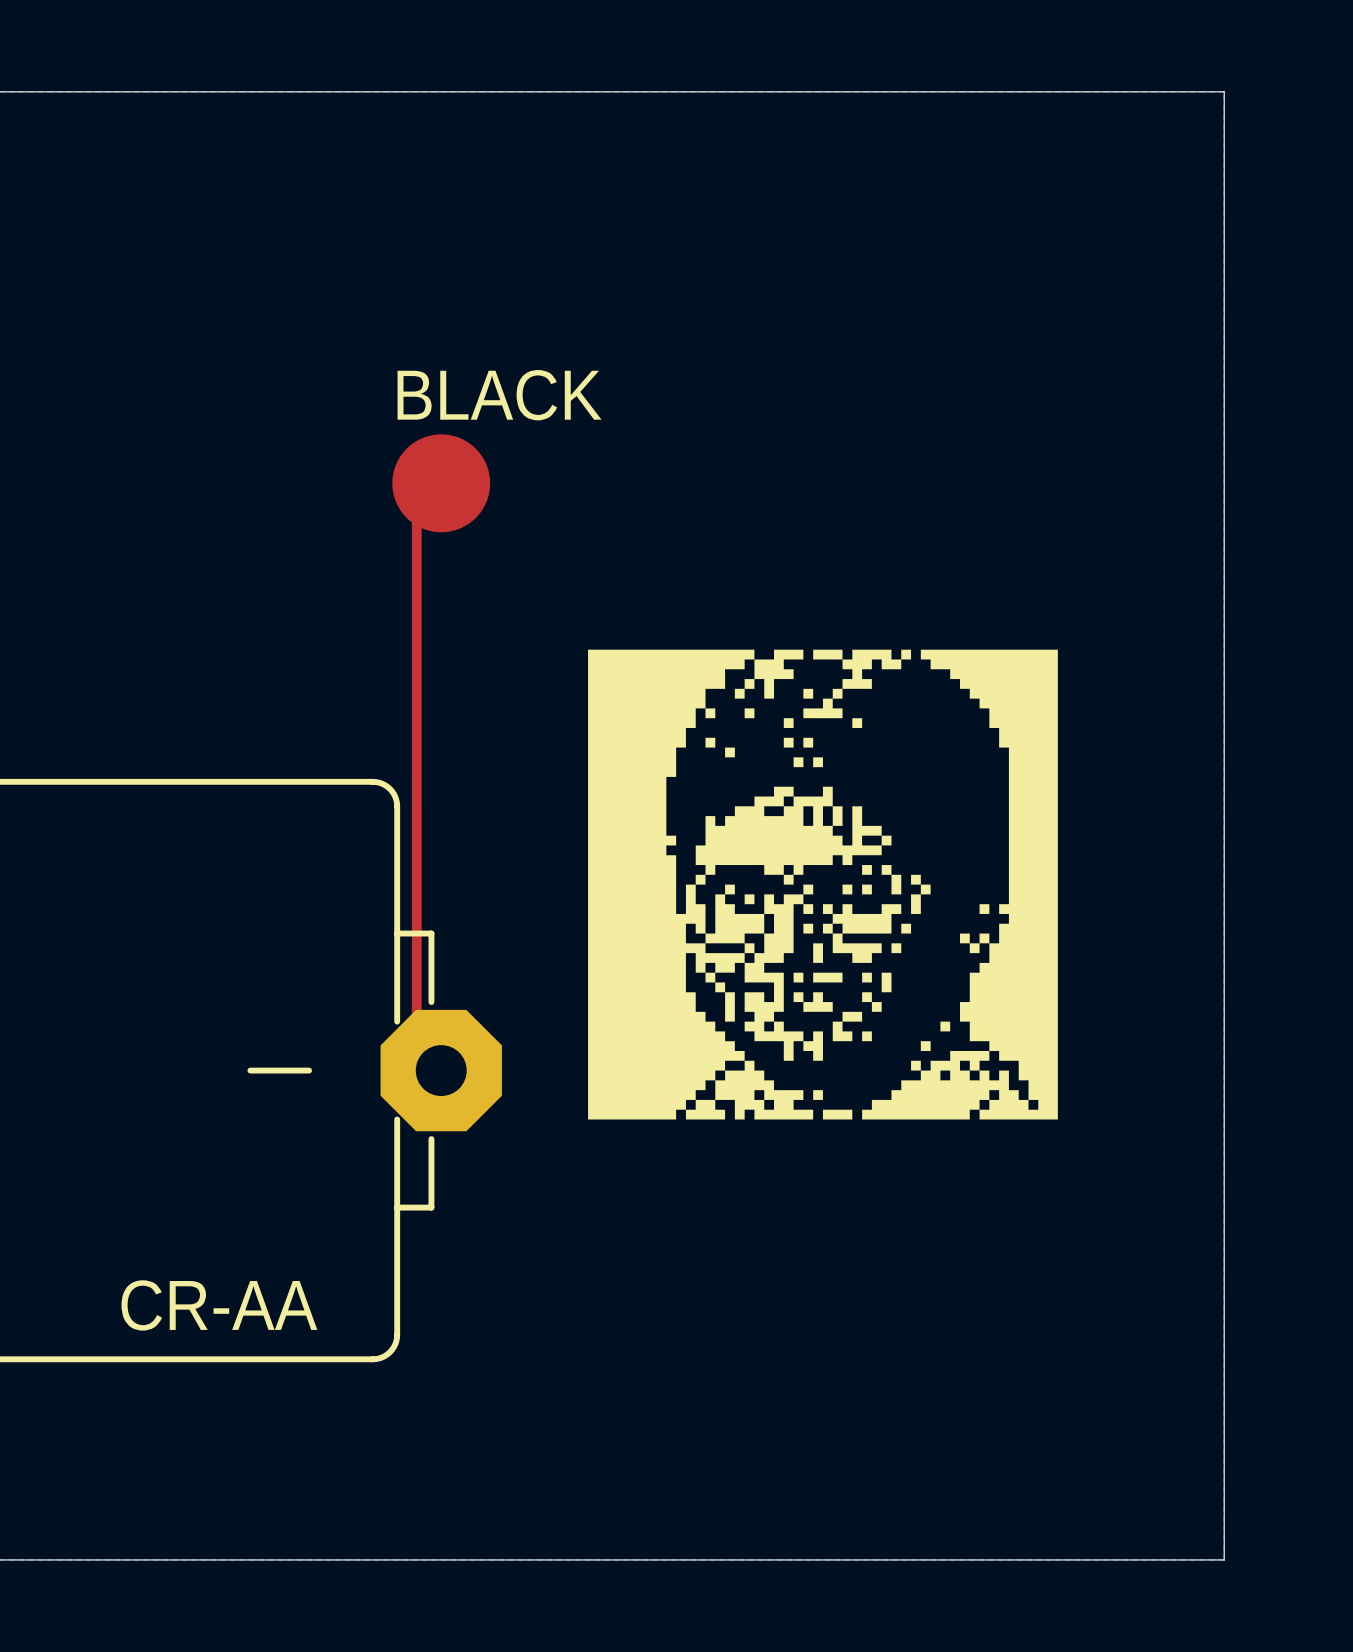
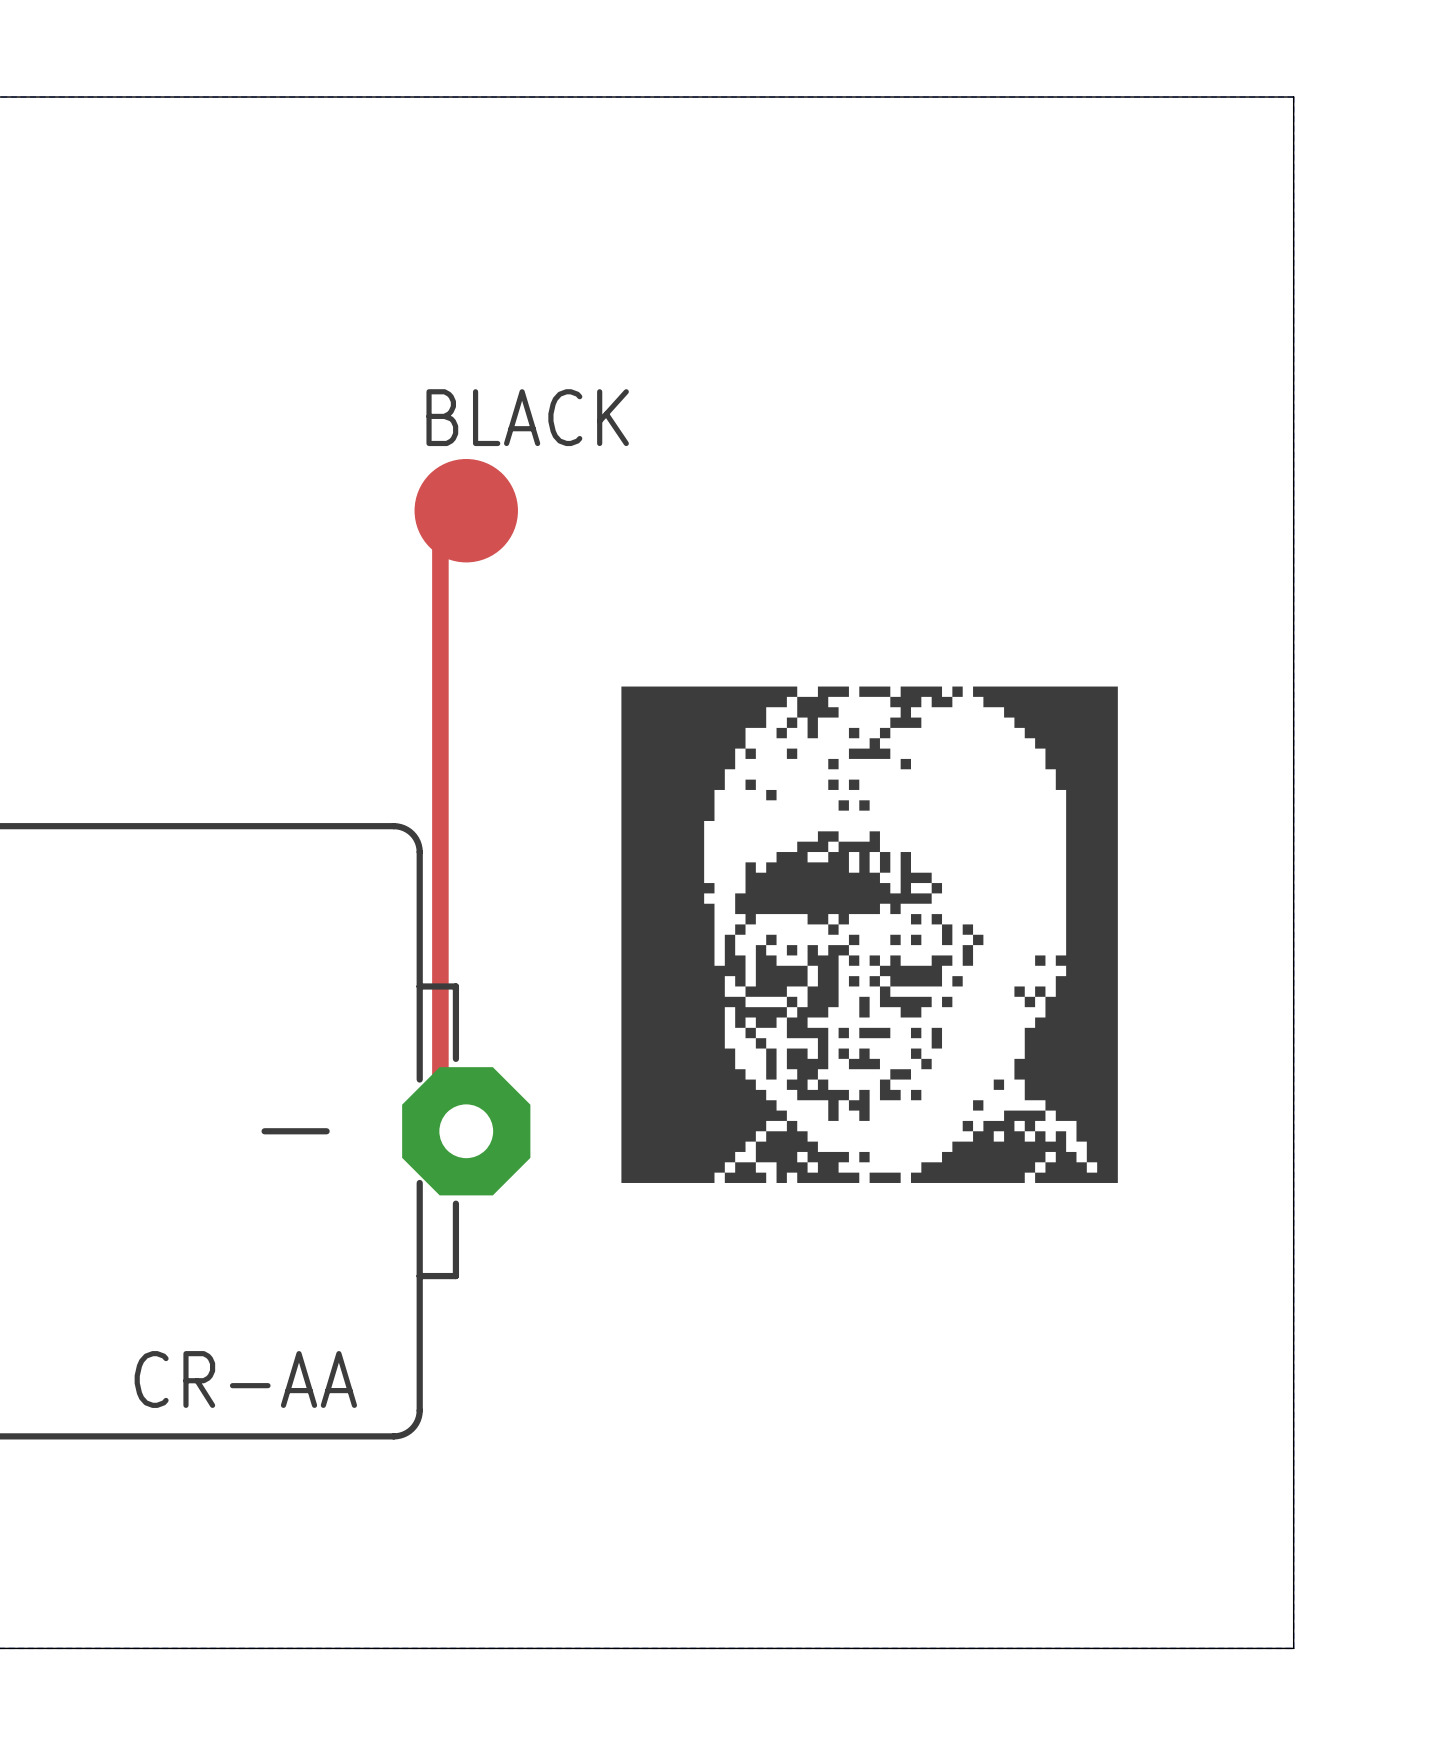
top track width: thin (441, 483) (416, 507) (416, 1021) (441, 1070) -> thick (466, 510) (440, 536) (440, 1079) (466, 1131)

